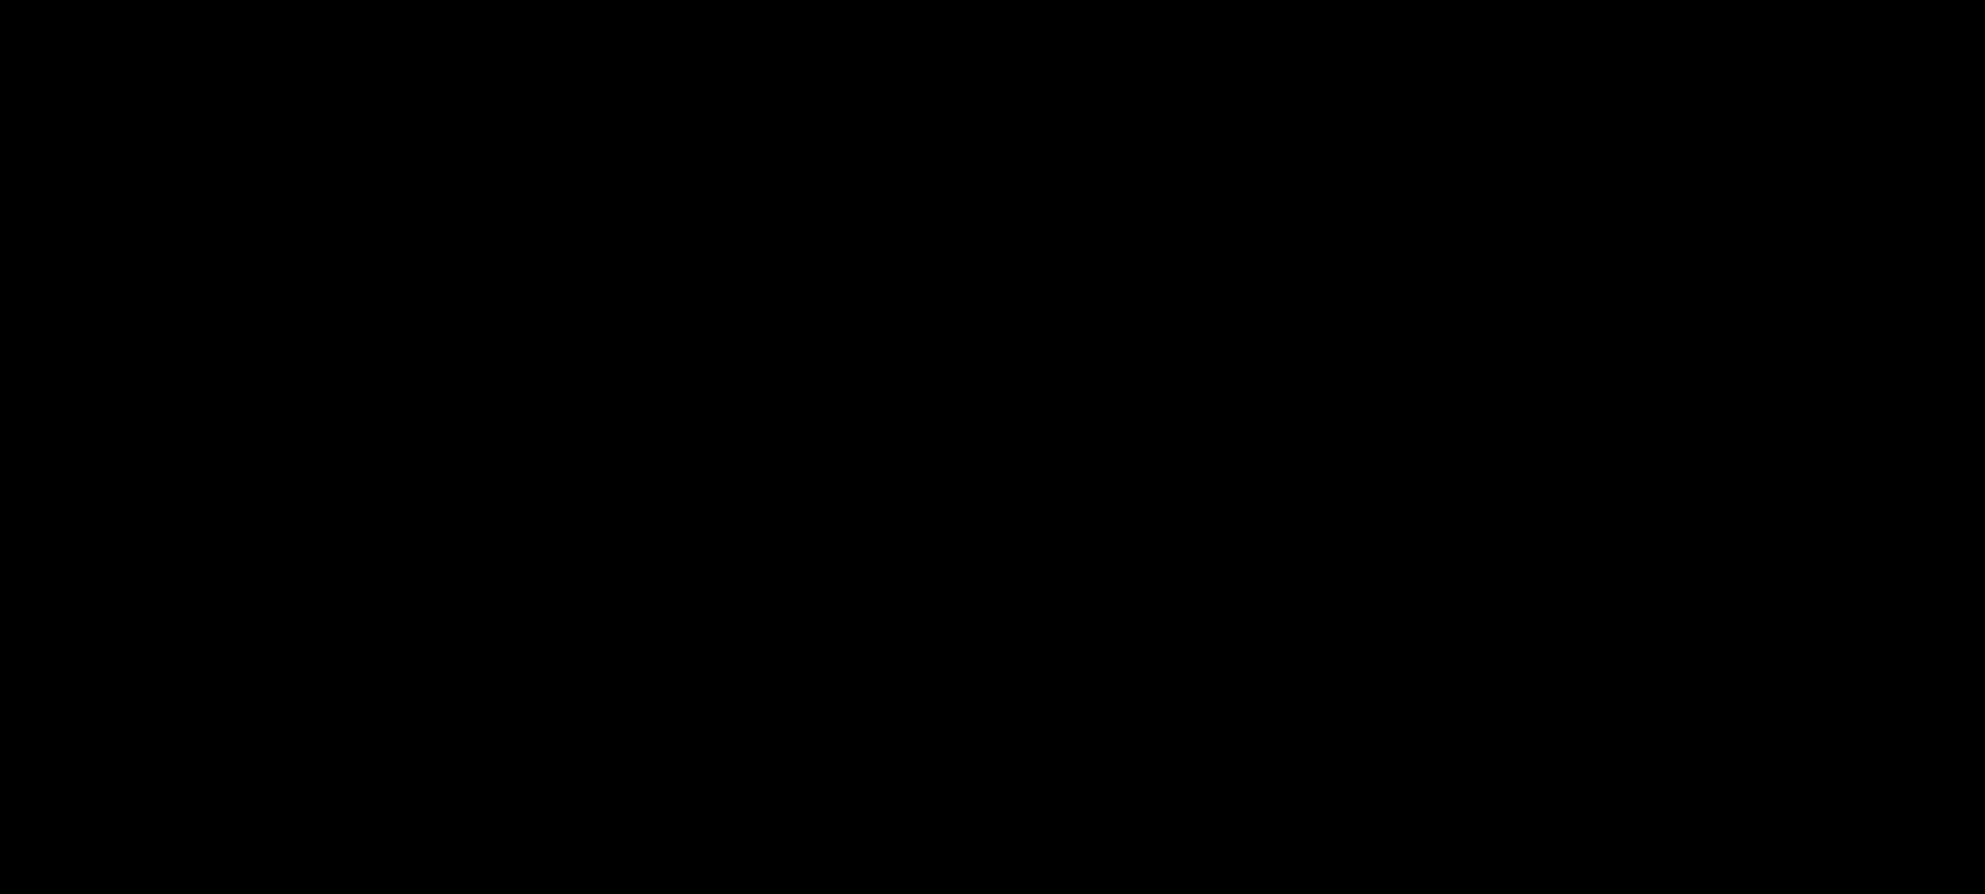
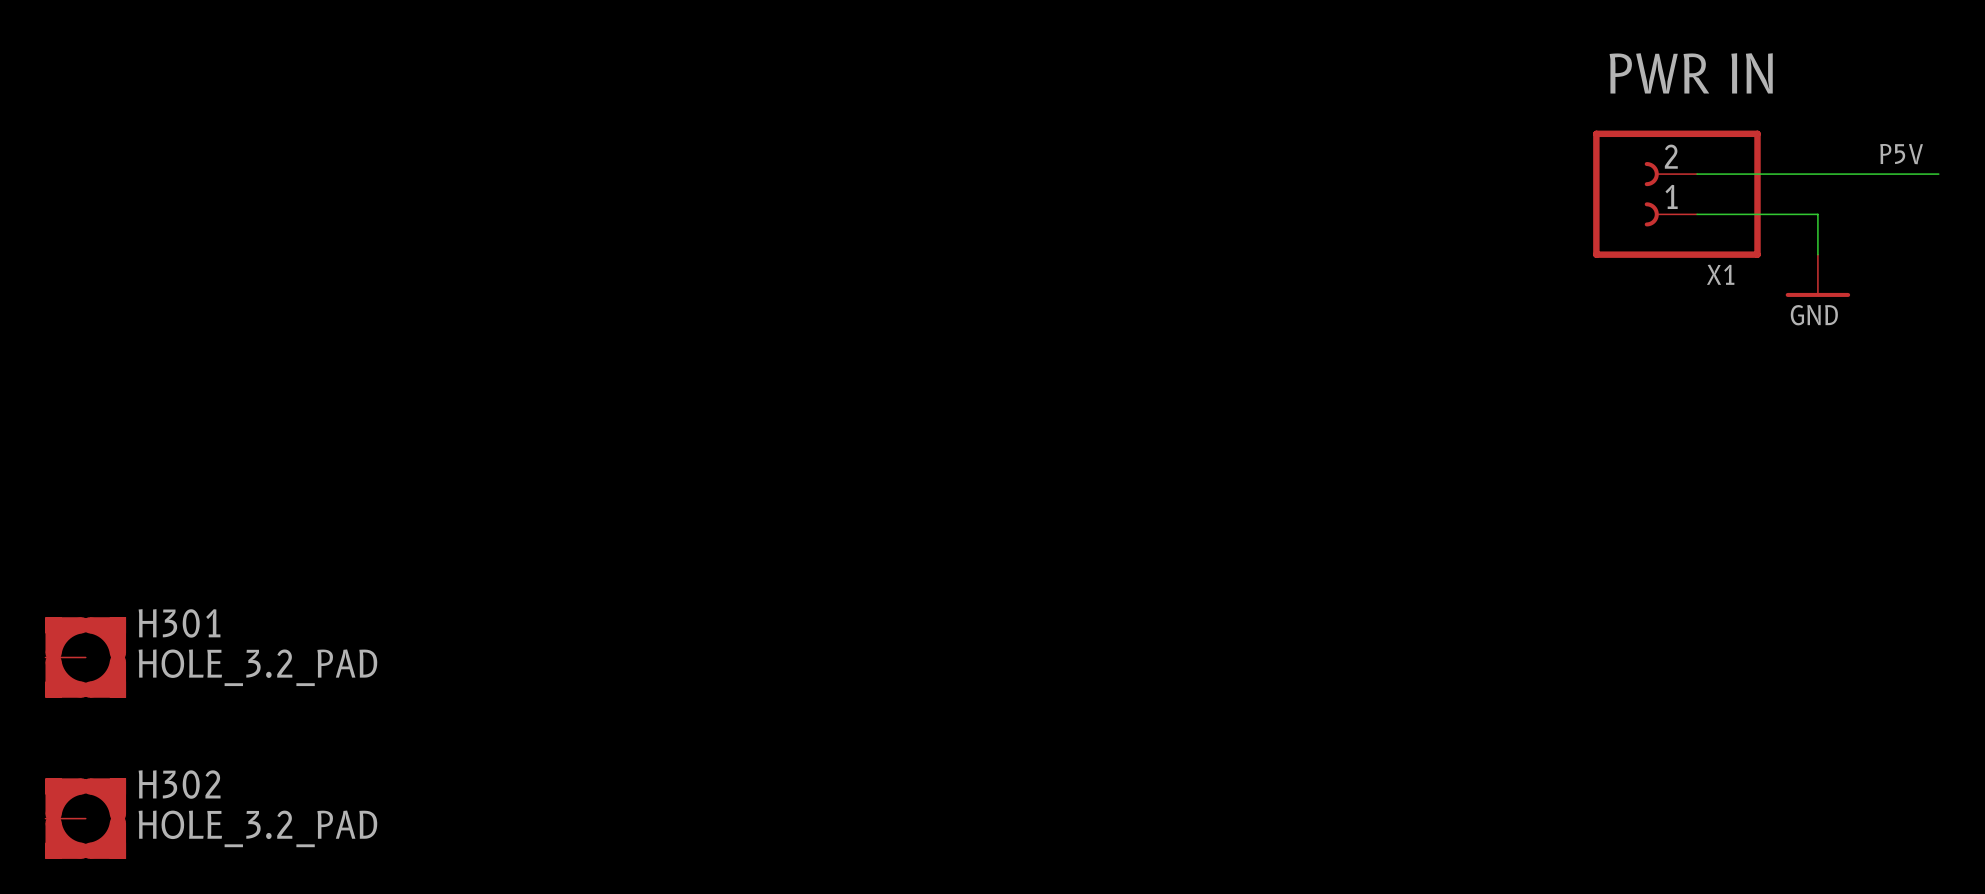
label: none -> P5V (1901, 154)
wire: none -> (1697, 174) (1938, 174)
X1: none -> (1676, 194)
wire: none -> (1697, 214) (1817, 214) (1817, 254)
power symbol: none -> GND (1817, 275)
H301: none -> HOLE_3.2_PAD (85, 657)
H302: none -> HOLE_3.2_PAD (85, 818)

